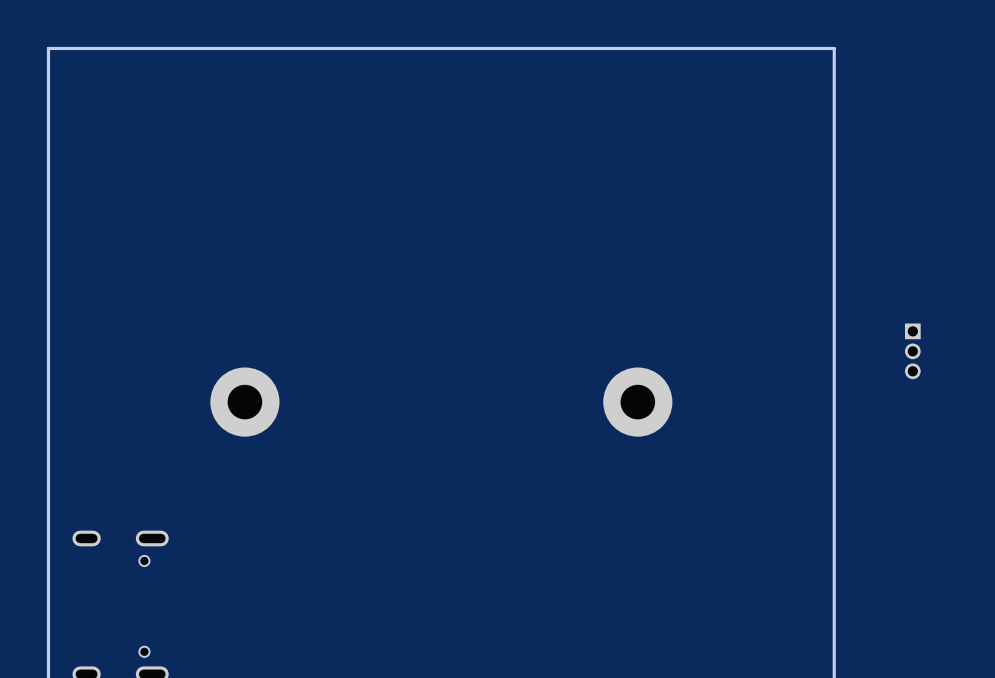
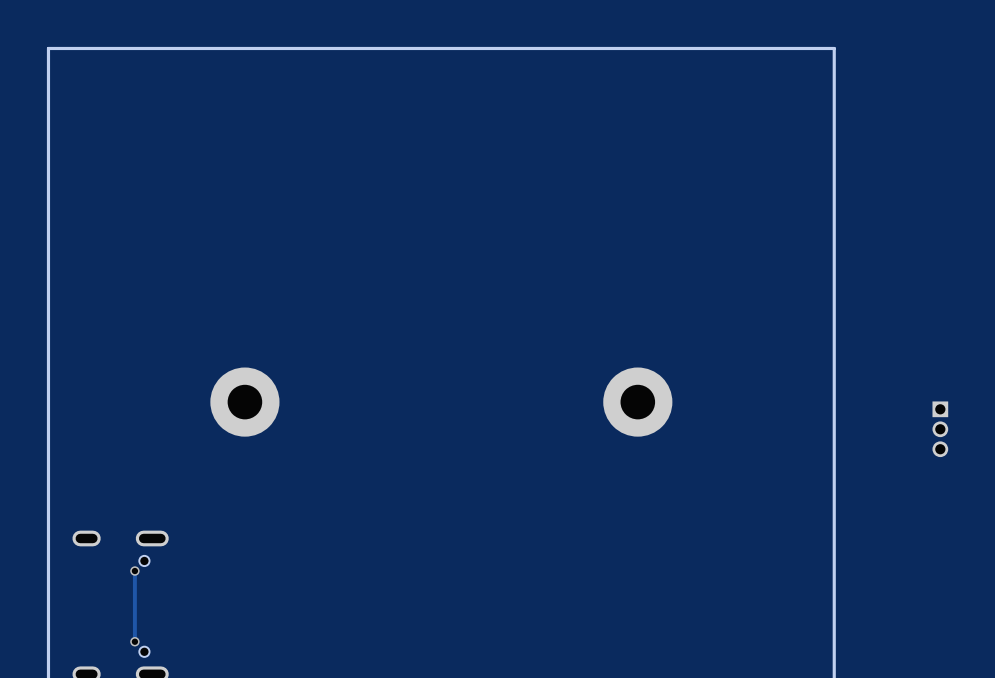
part position: (912, 351) -> (940, 429)
track: none -> (134, 571) (134, 641)
via: none -> (134, 571)
via: none -> (134, 641)

